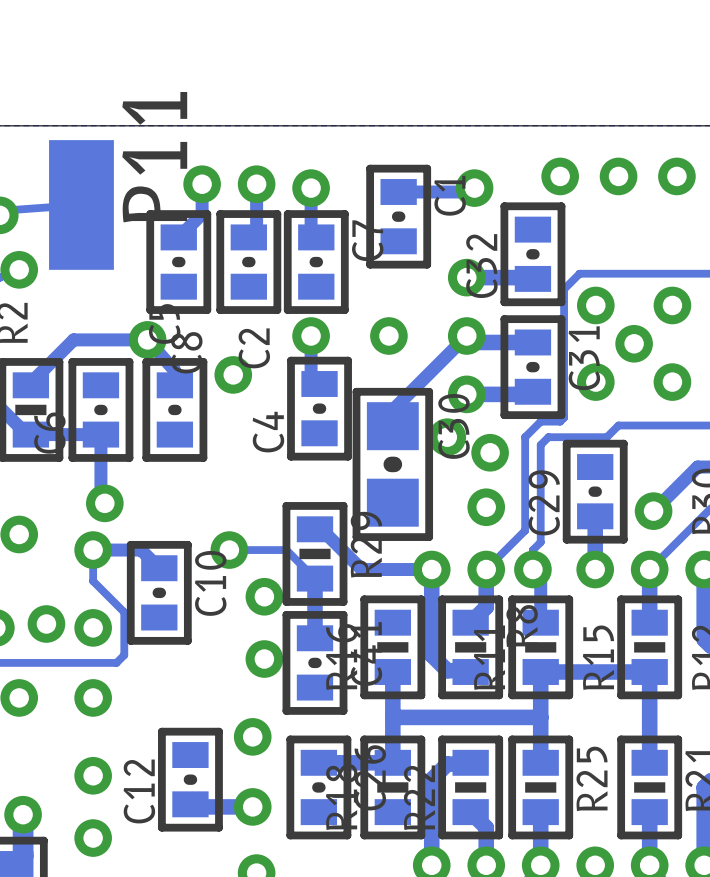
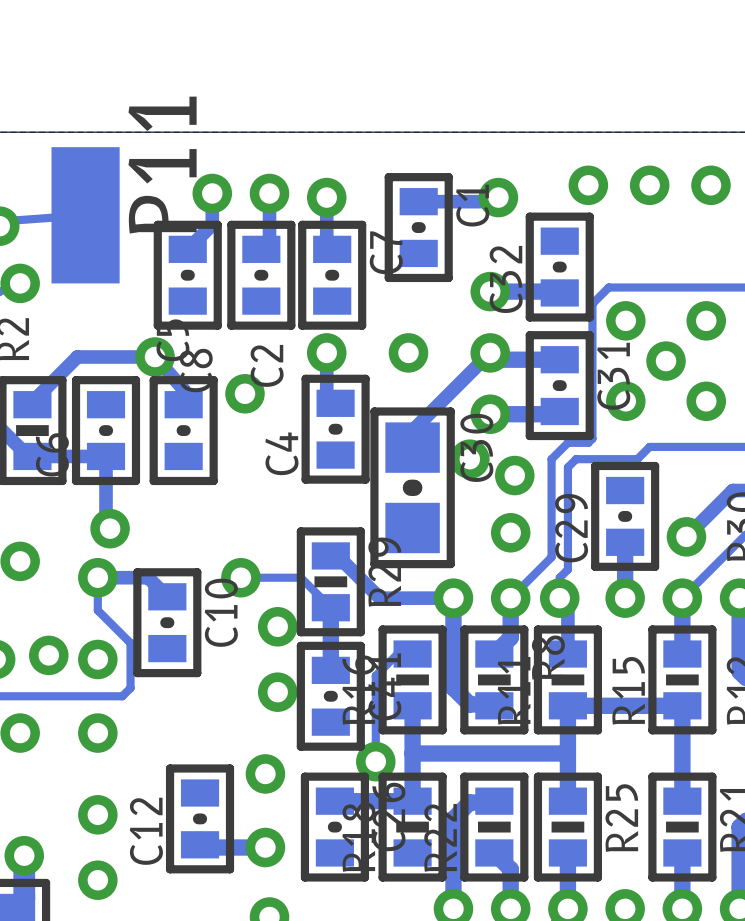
track: none -> (412, 654) (397, 654) (375, 675) (375, 761)
via: none -> (375, 761)

